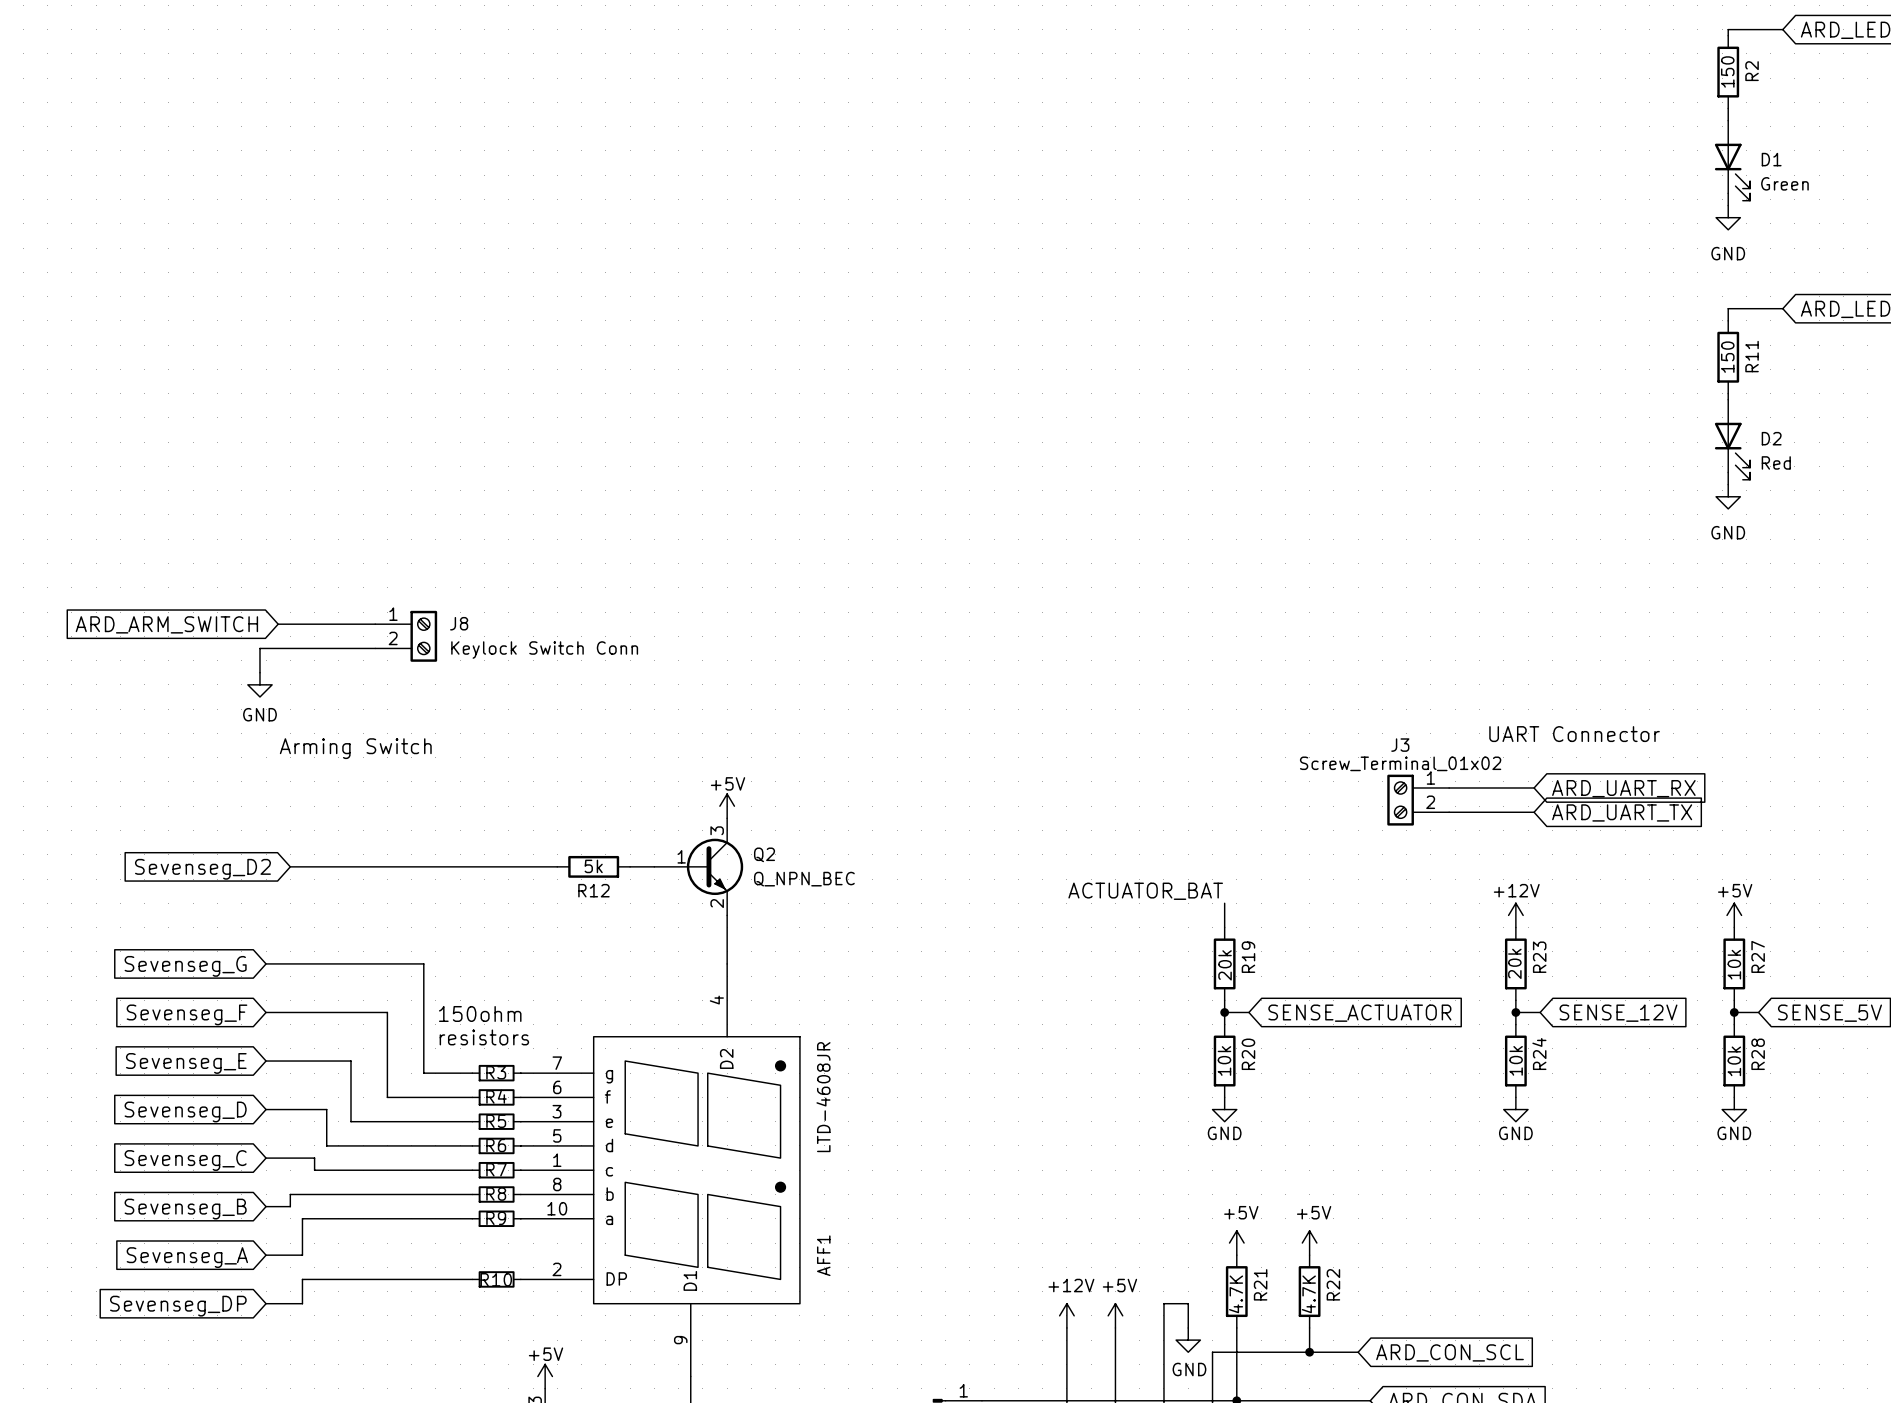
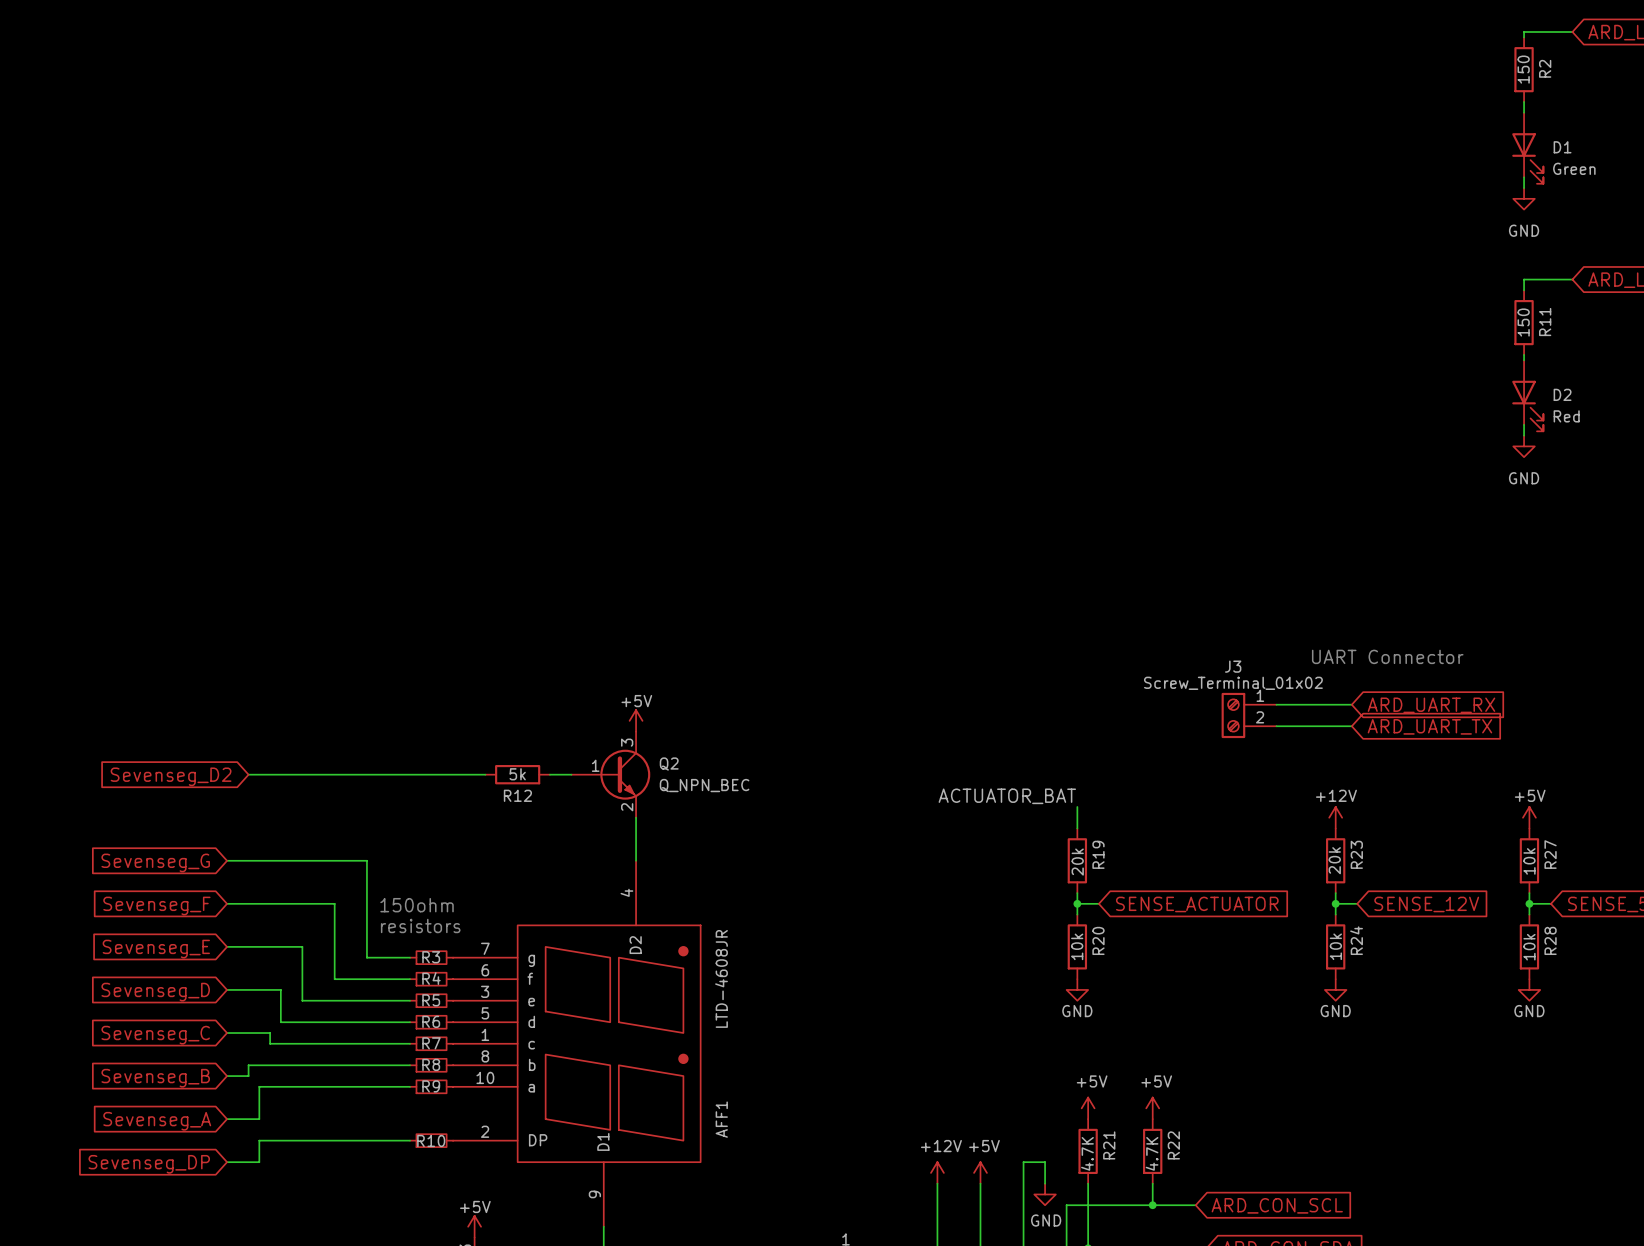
global label: ARD_ARM_SWITCH (166, 624) -> none
wire: (278, 624) (375, 624) -> none
J8: Keylock Switch Conn (406, 636) -> none
wire: (375, 648) (259, 648) (259, 672) -> none
power symbol: GND (259, 684) -> none
text: Arming Switch (355, 748) -> none

